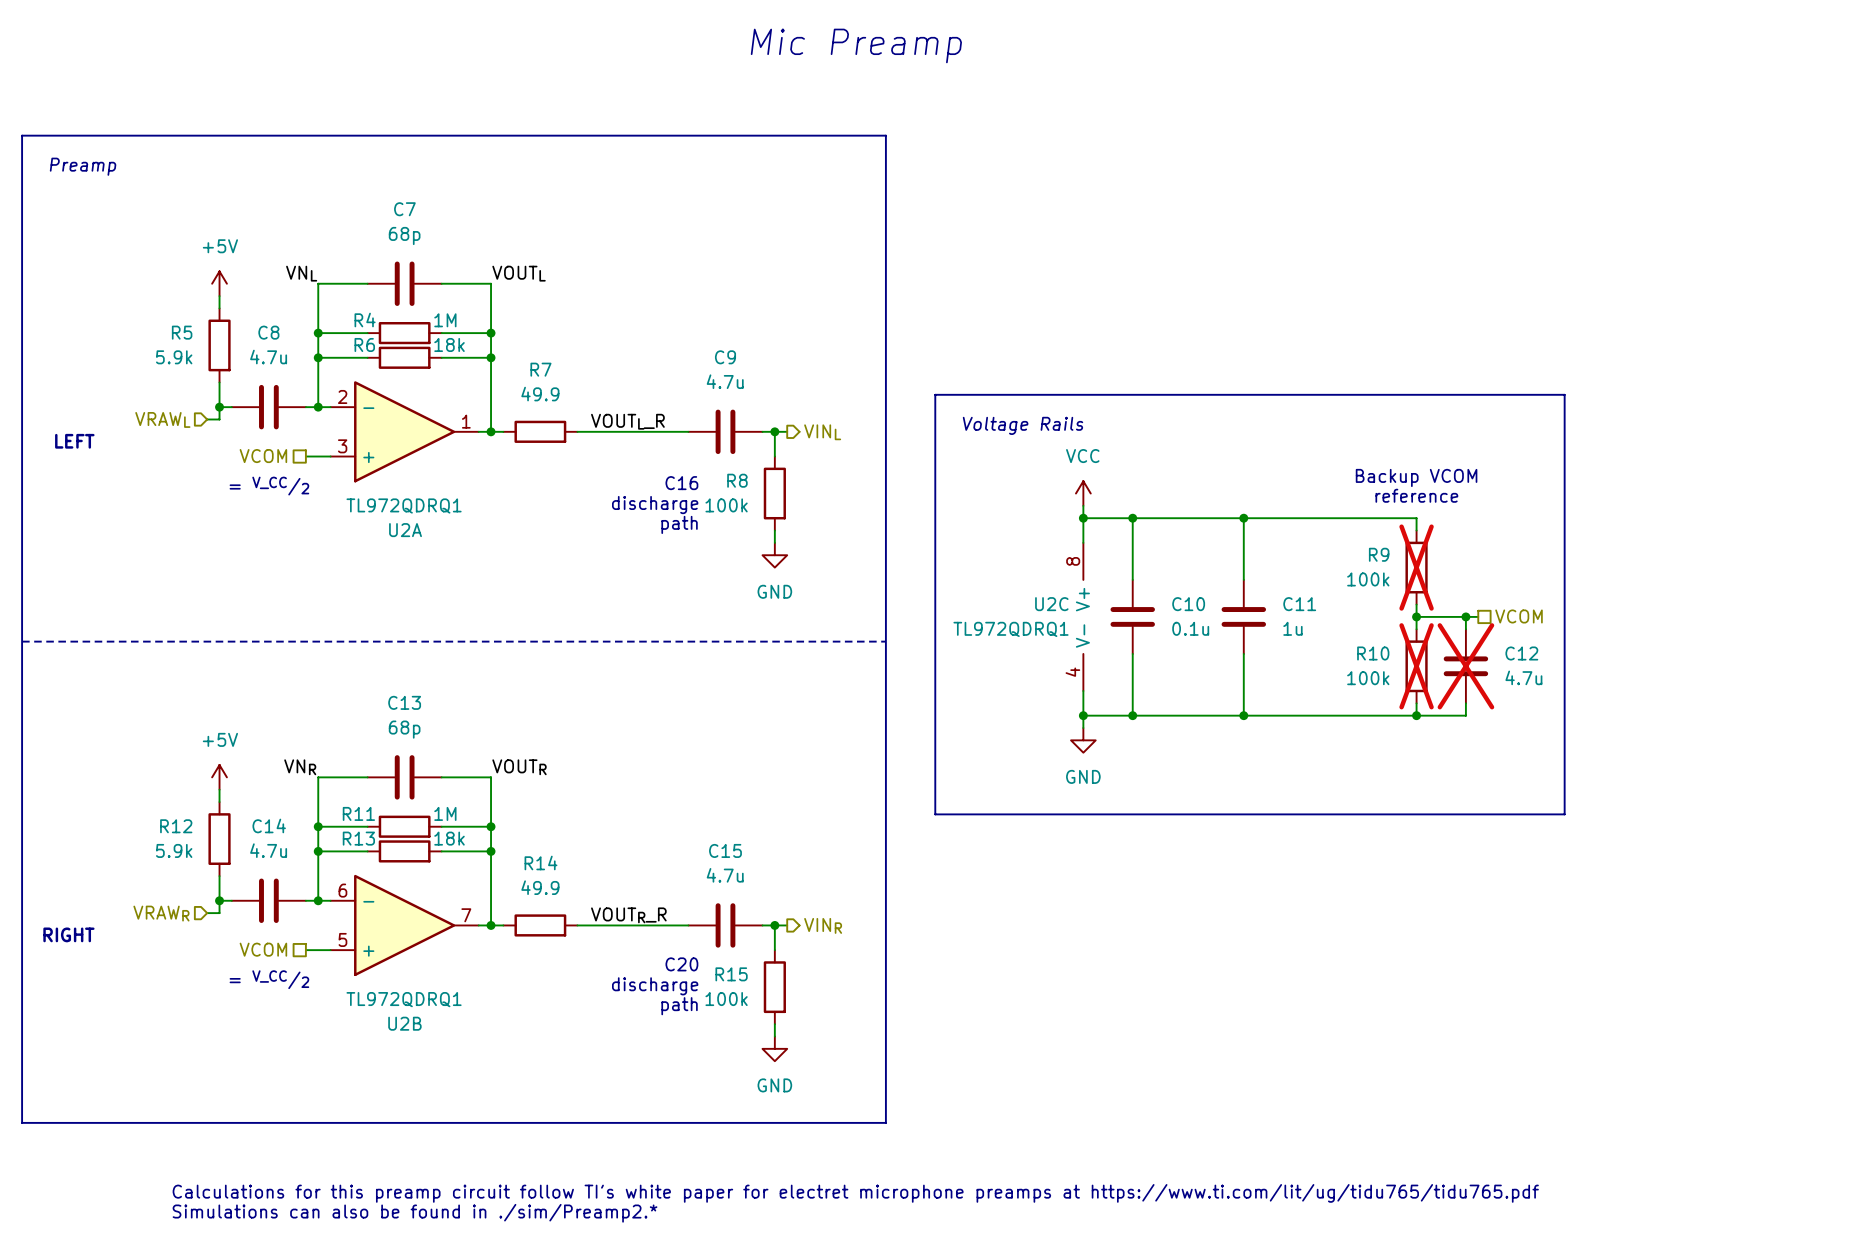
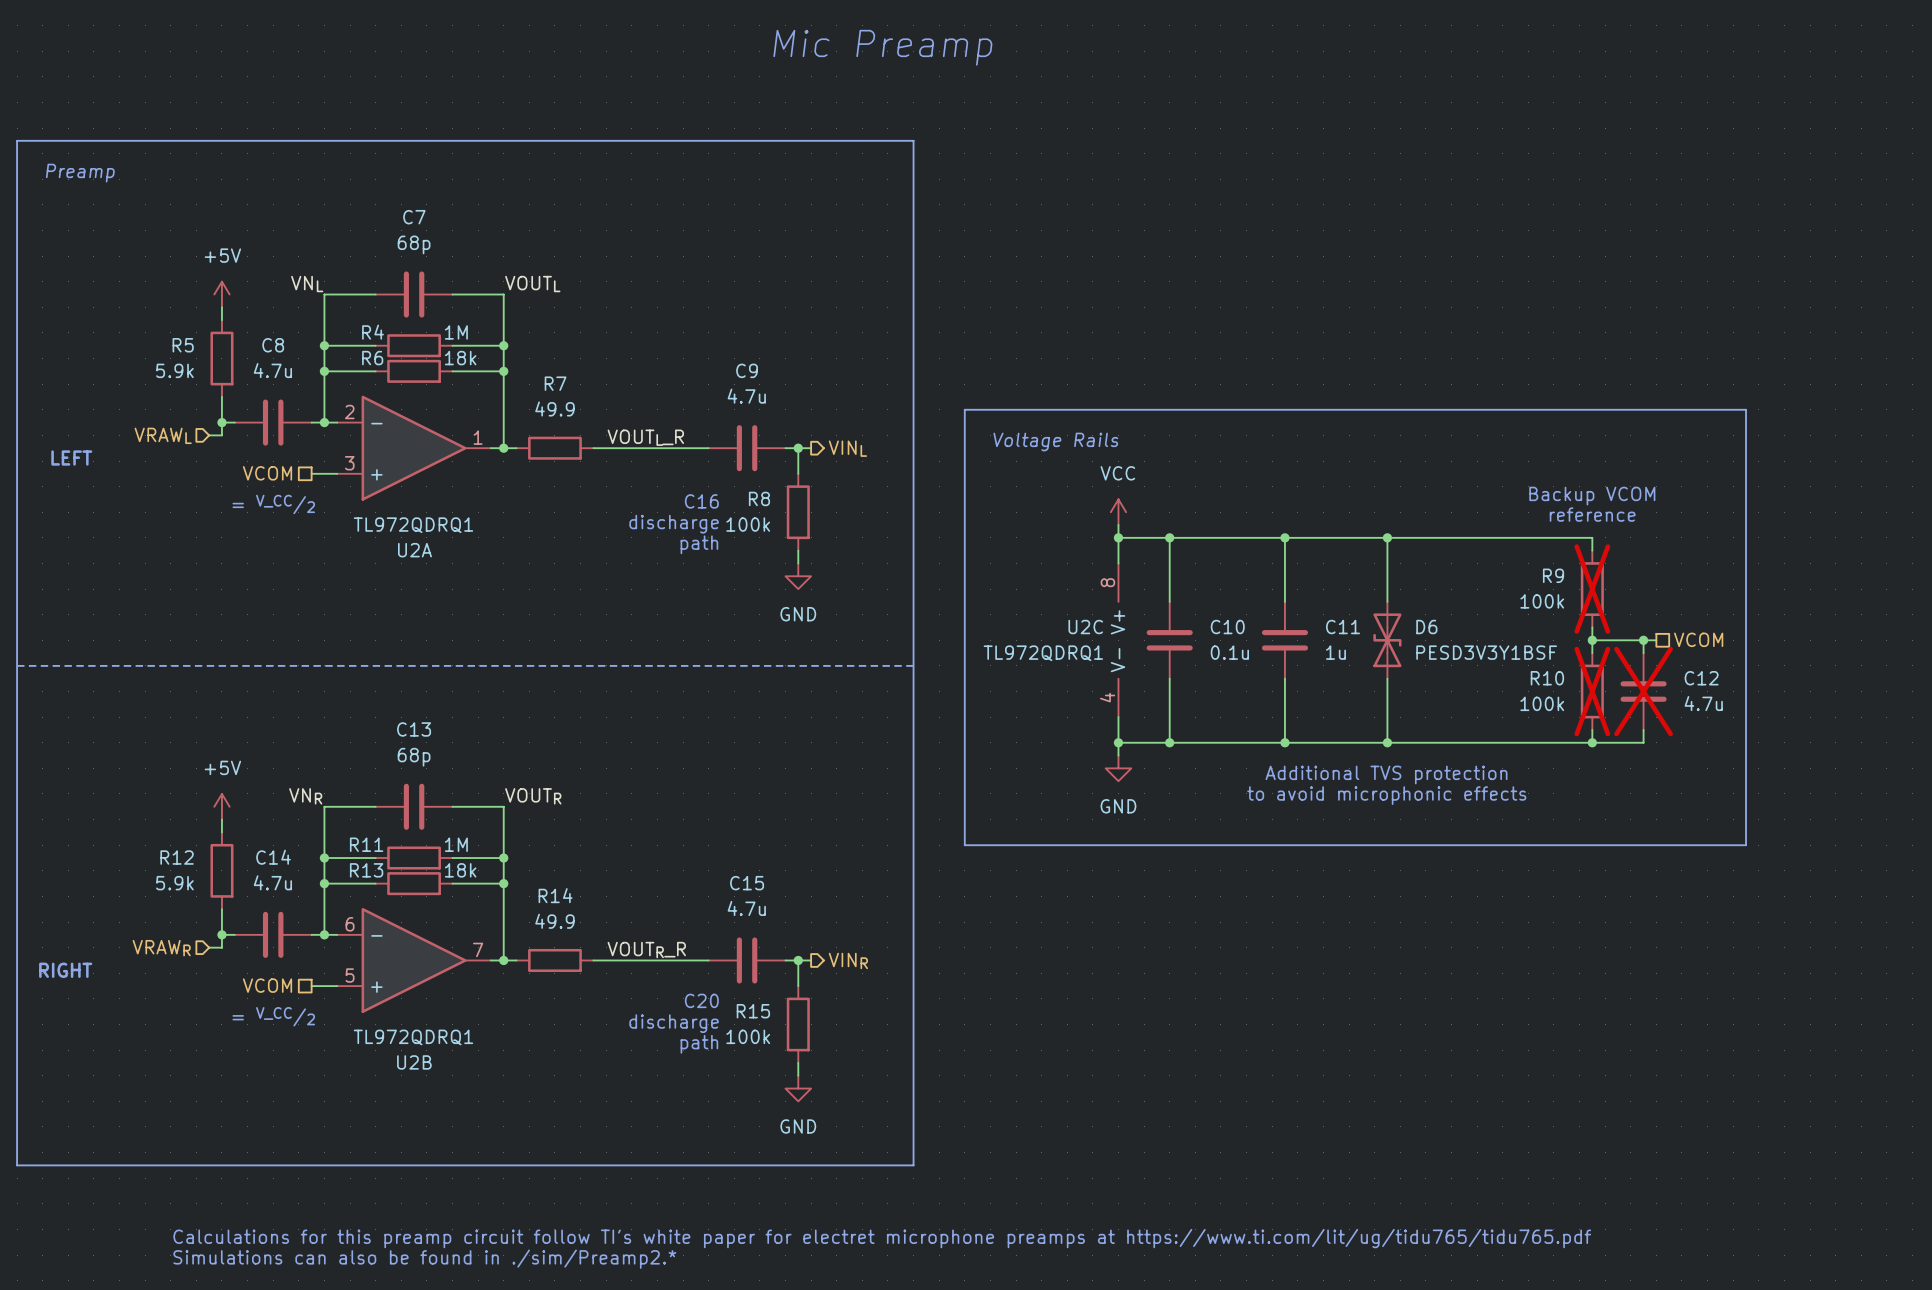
line: (1564, 394) (1564, 814) -> (1617, 409) (1746, 409) (1746, 845) (1617, 845)
text position: Backup VCOM (1416, 477) -> Backup VCOM (1592, 496)
text position: reference (1416, 495) -> reference (1592, 514)
wire: none -> (1387, 537) (1387, 601)
junction: none -> (1387, 537)
wire: (1416, 518) (1416, 530) -> (1464, 537) (1592, 537) (1592, 550)
R9 position: (1416, 567) -> (1592, 589)
wire: (1416, 604) (1416, 629) -> (1592, 627) (1592, 653)
D6: none -> PESD3V3Y1BSF (1387, 640)
wire: (1416, 616) (1478, 616) -> (1592, 640) (1656, 640)
junction: (1416, 616) -> none
junction: (1465, 616) -> none
hierarchical label position: VCOM (1519, 616) -> VCOM (1698, 639)
junction: none -> (1592, 640)
junction: none -> (1643, 640)
wire: none -> (1387, 678) (1387, 742)
R10 position: (1416, 666) -> (1592, 691)
C12 position: (1465, 666) -> (1643, 691)
wire: (1416, 703) (1416, 715) -> (1592, 729) (1592, 742)
wire: (1465, 703) (1465, 715) -> (1643, 729) (1643, 742) (1515, 742)
junction: none -> (1387, 742)
junction: (1416, 715) -> none
junction: none -> (1592, 742)
text: none -> Additional TVS protection (1386, 775)
text: none -> to avoid microphonic effects (1386, 795)

